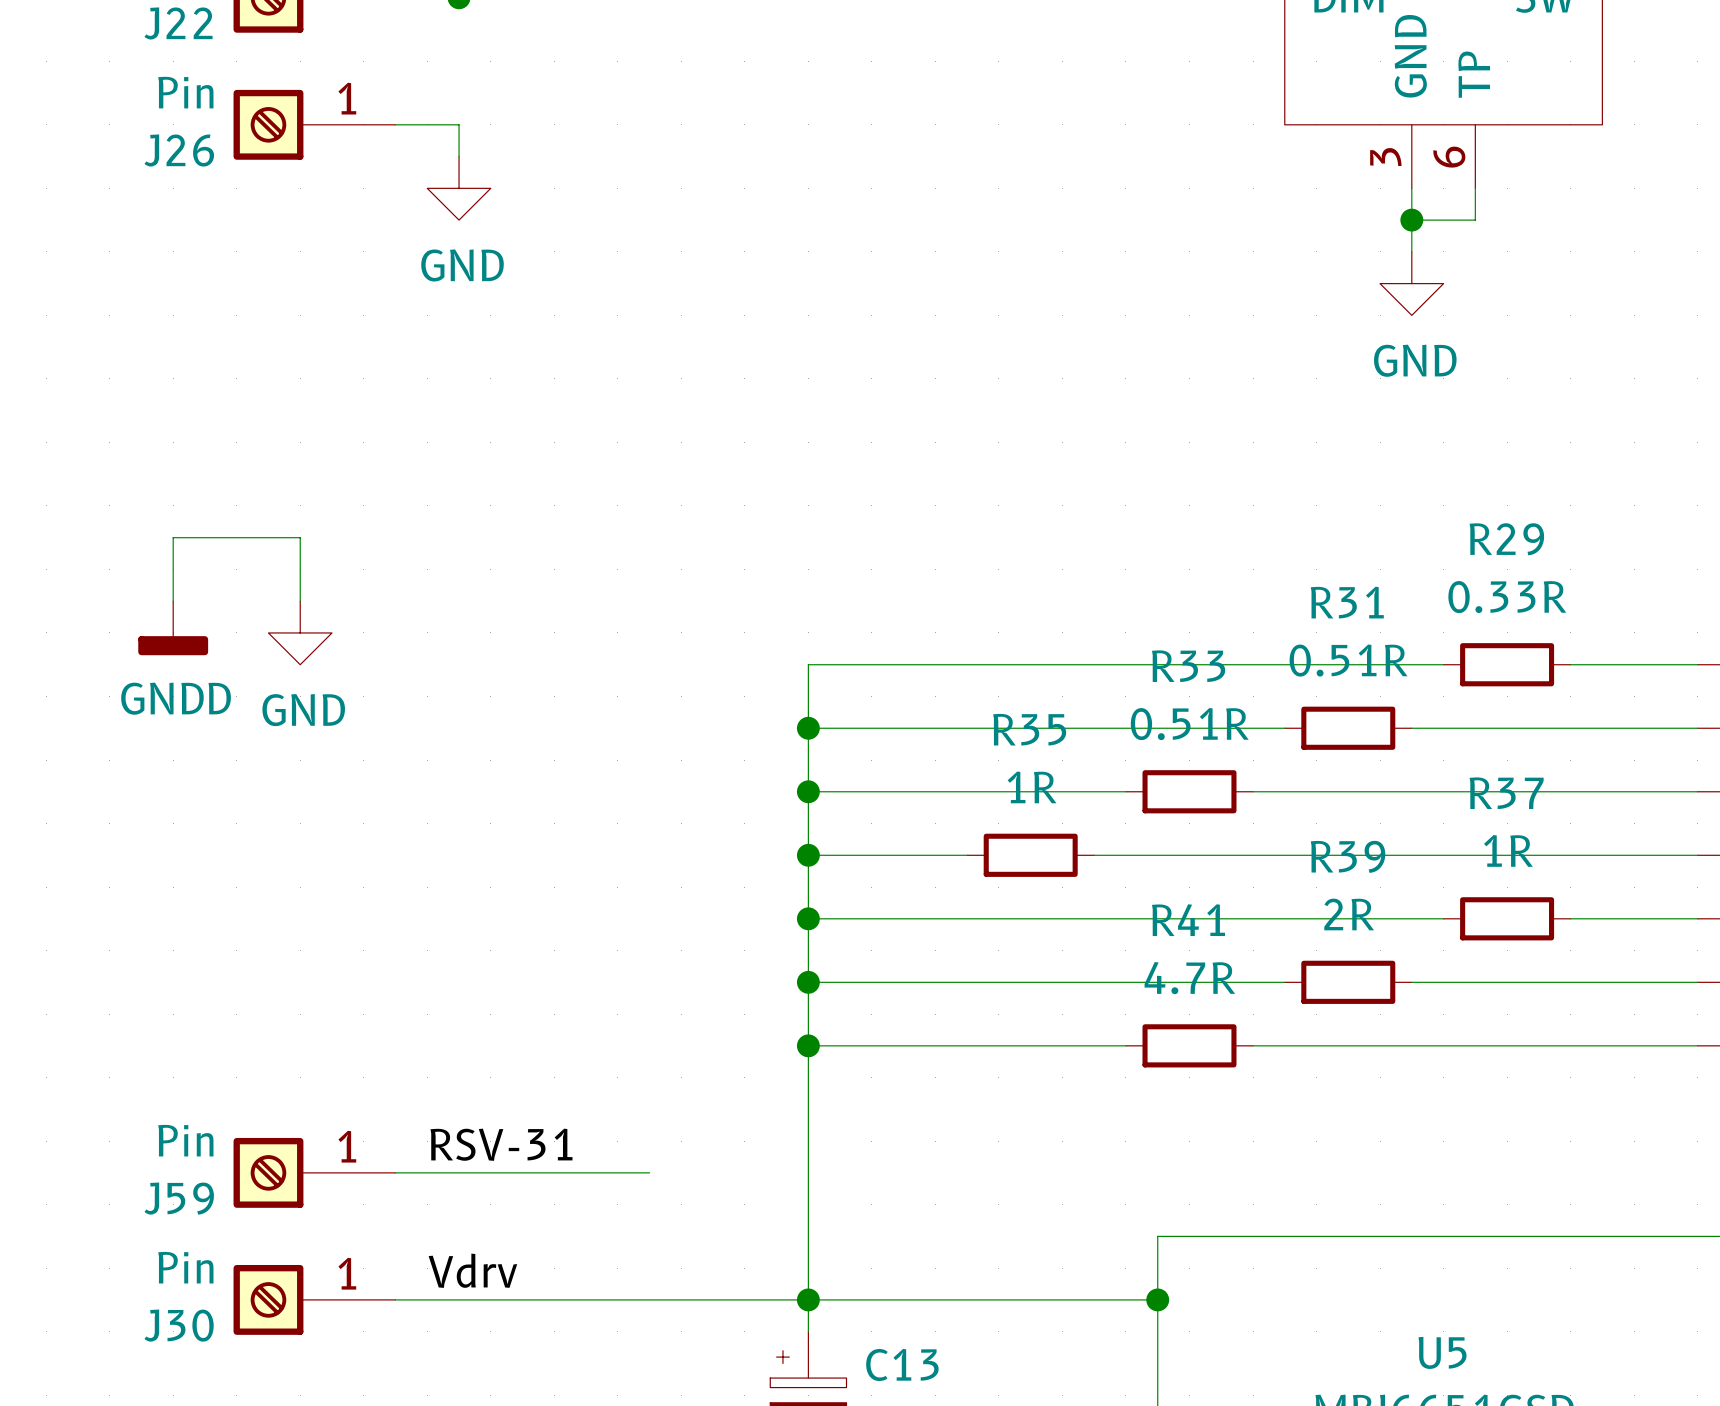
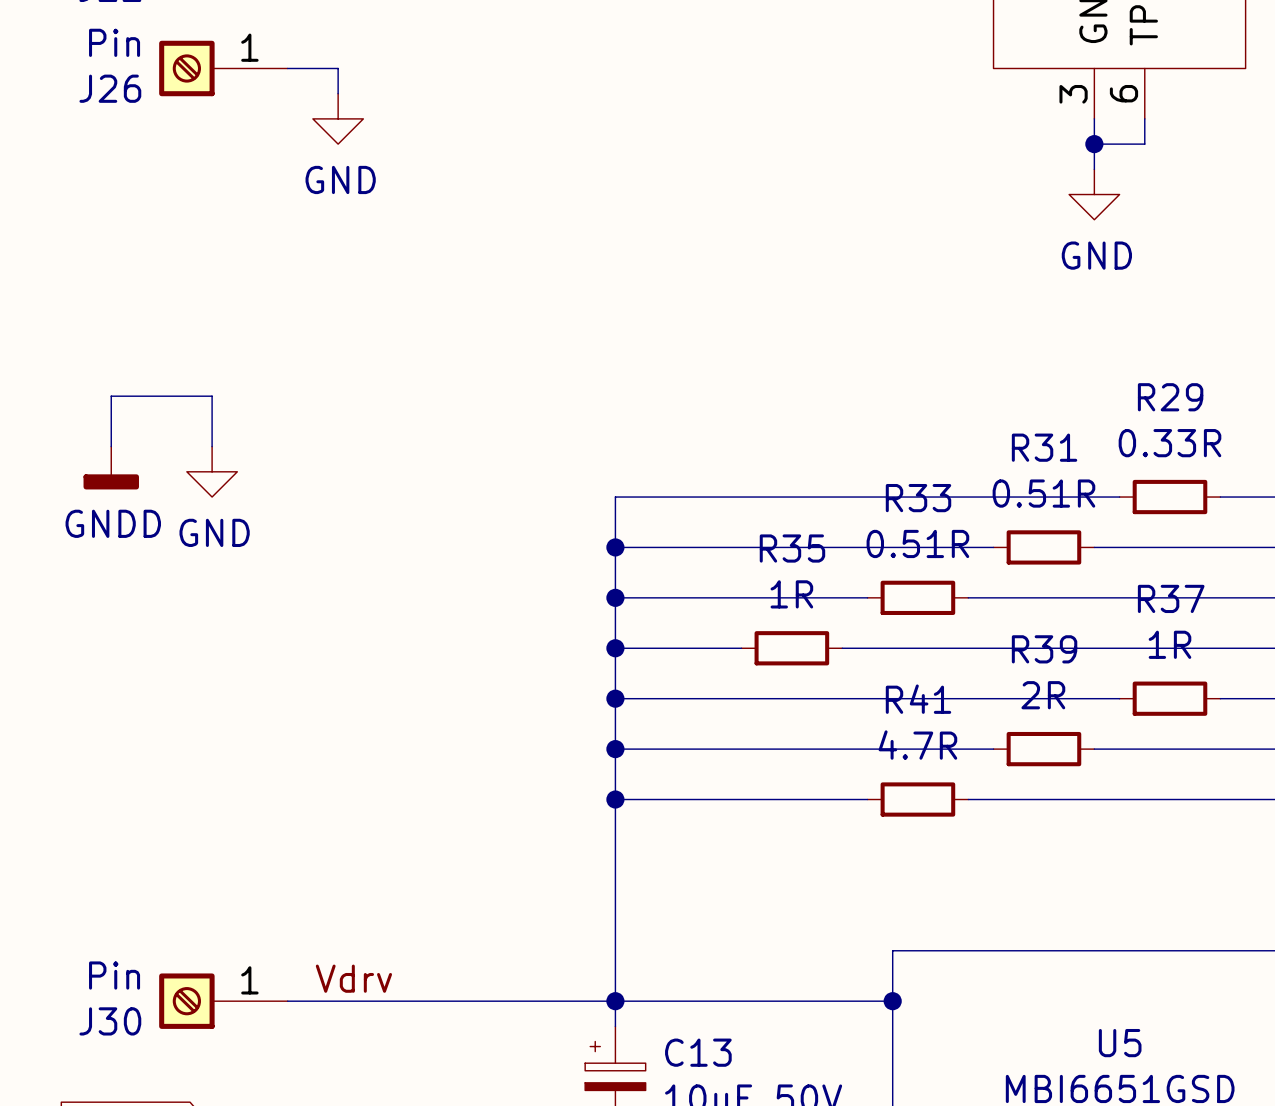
label: RSV-31 (501, 1144) -> none
J59: Pin (314, 1172) -> none
wire: (395, 1172) (649, 1172) -> none

